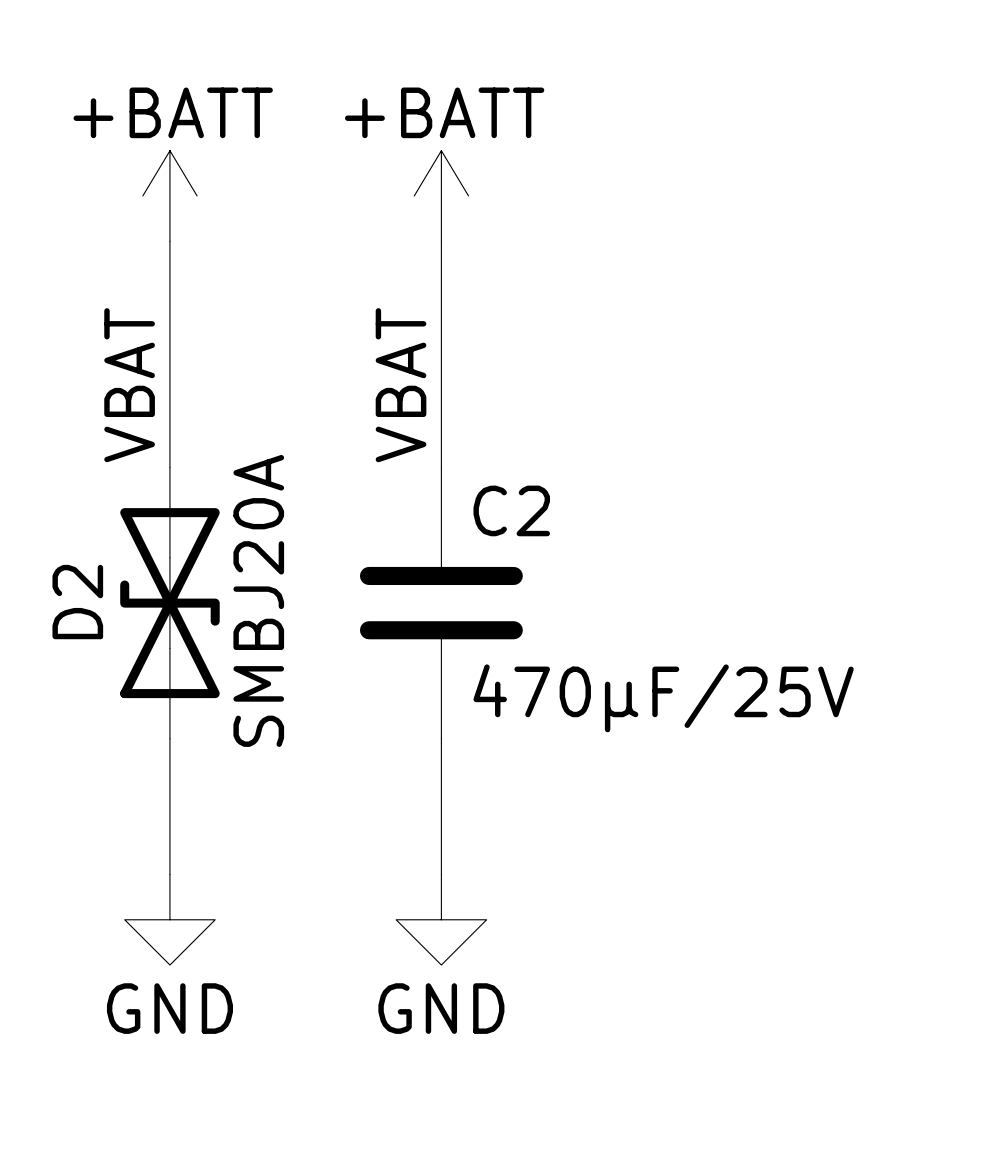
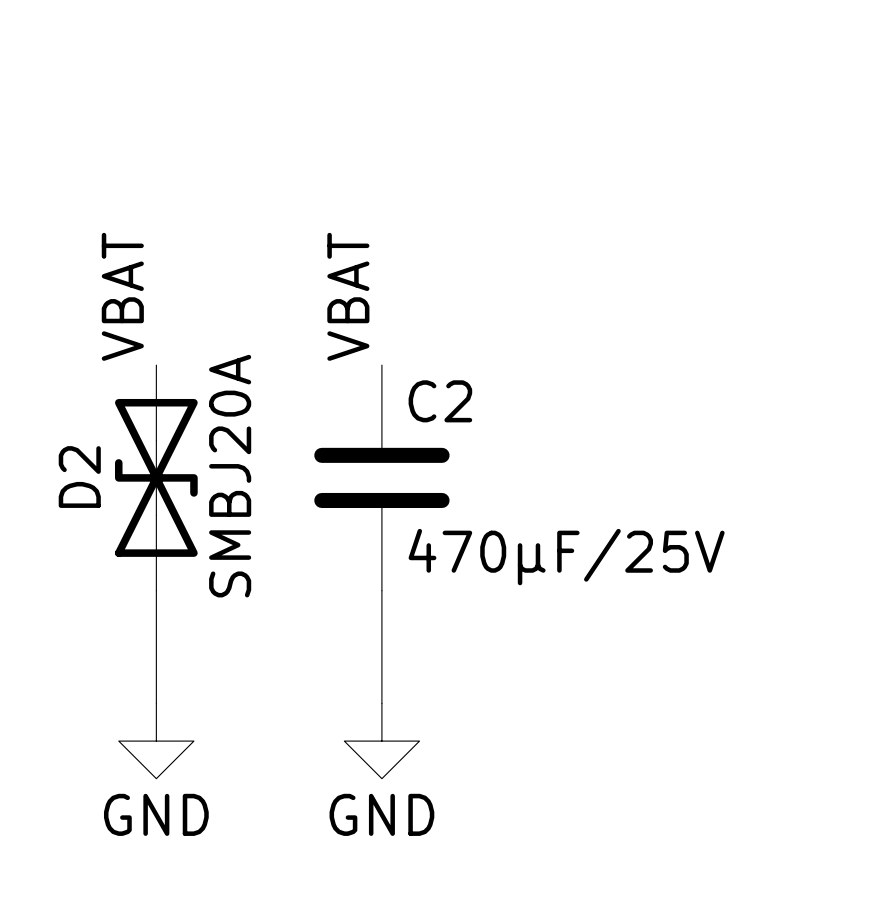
power symbol: +BATT (169, 195) -> none
power symbol: +BATT (441, 195) -> none
wire: (169, 241) (169, 467) -> none
wire: (441, 241) (441, 467) -> none

